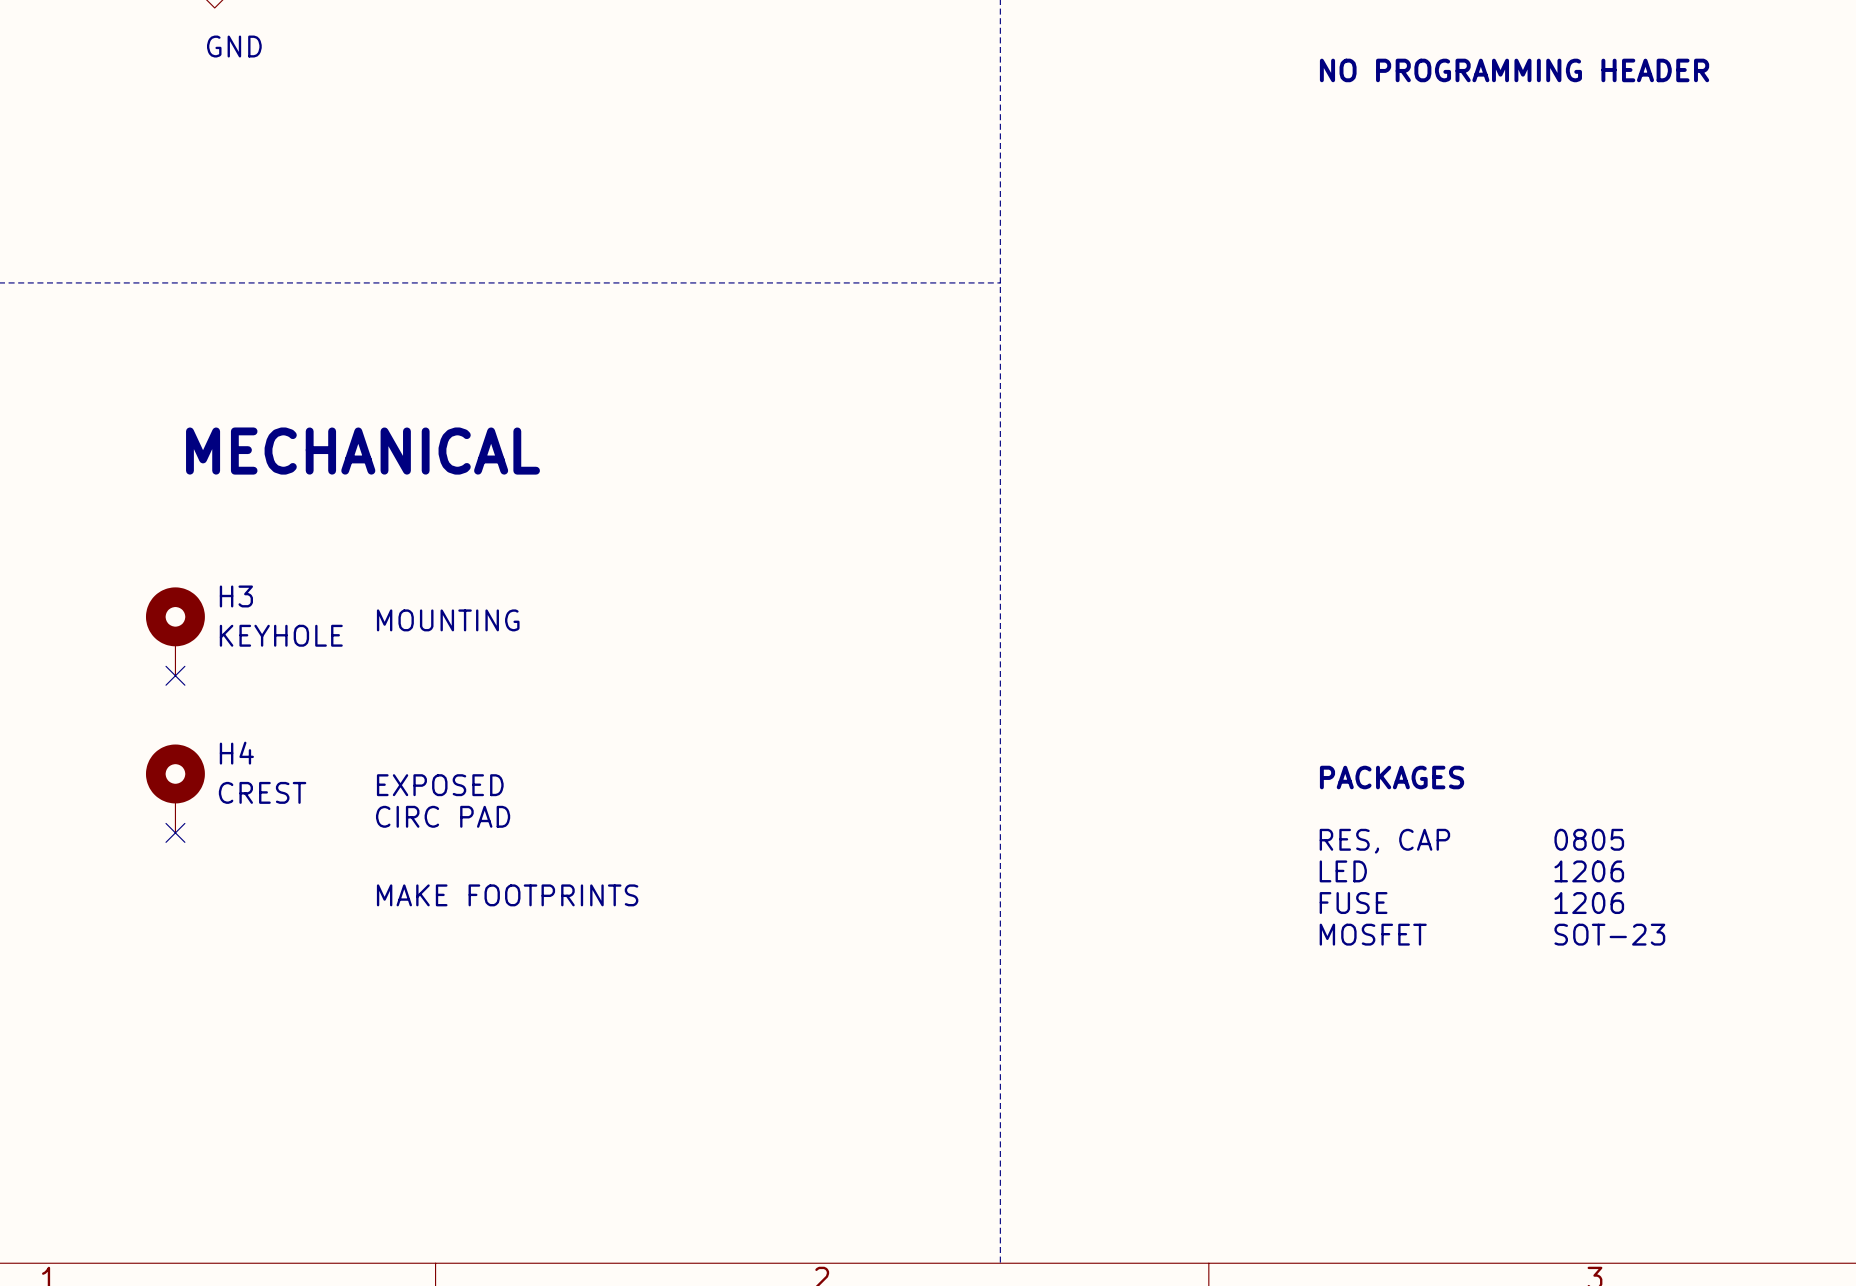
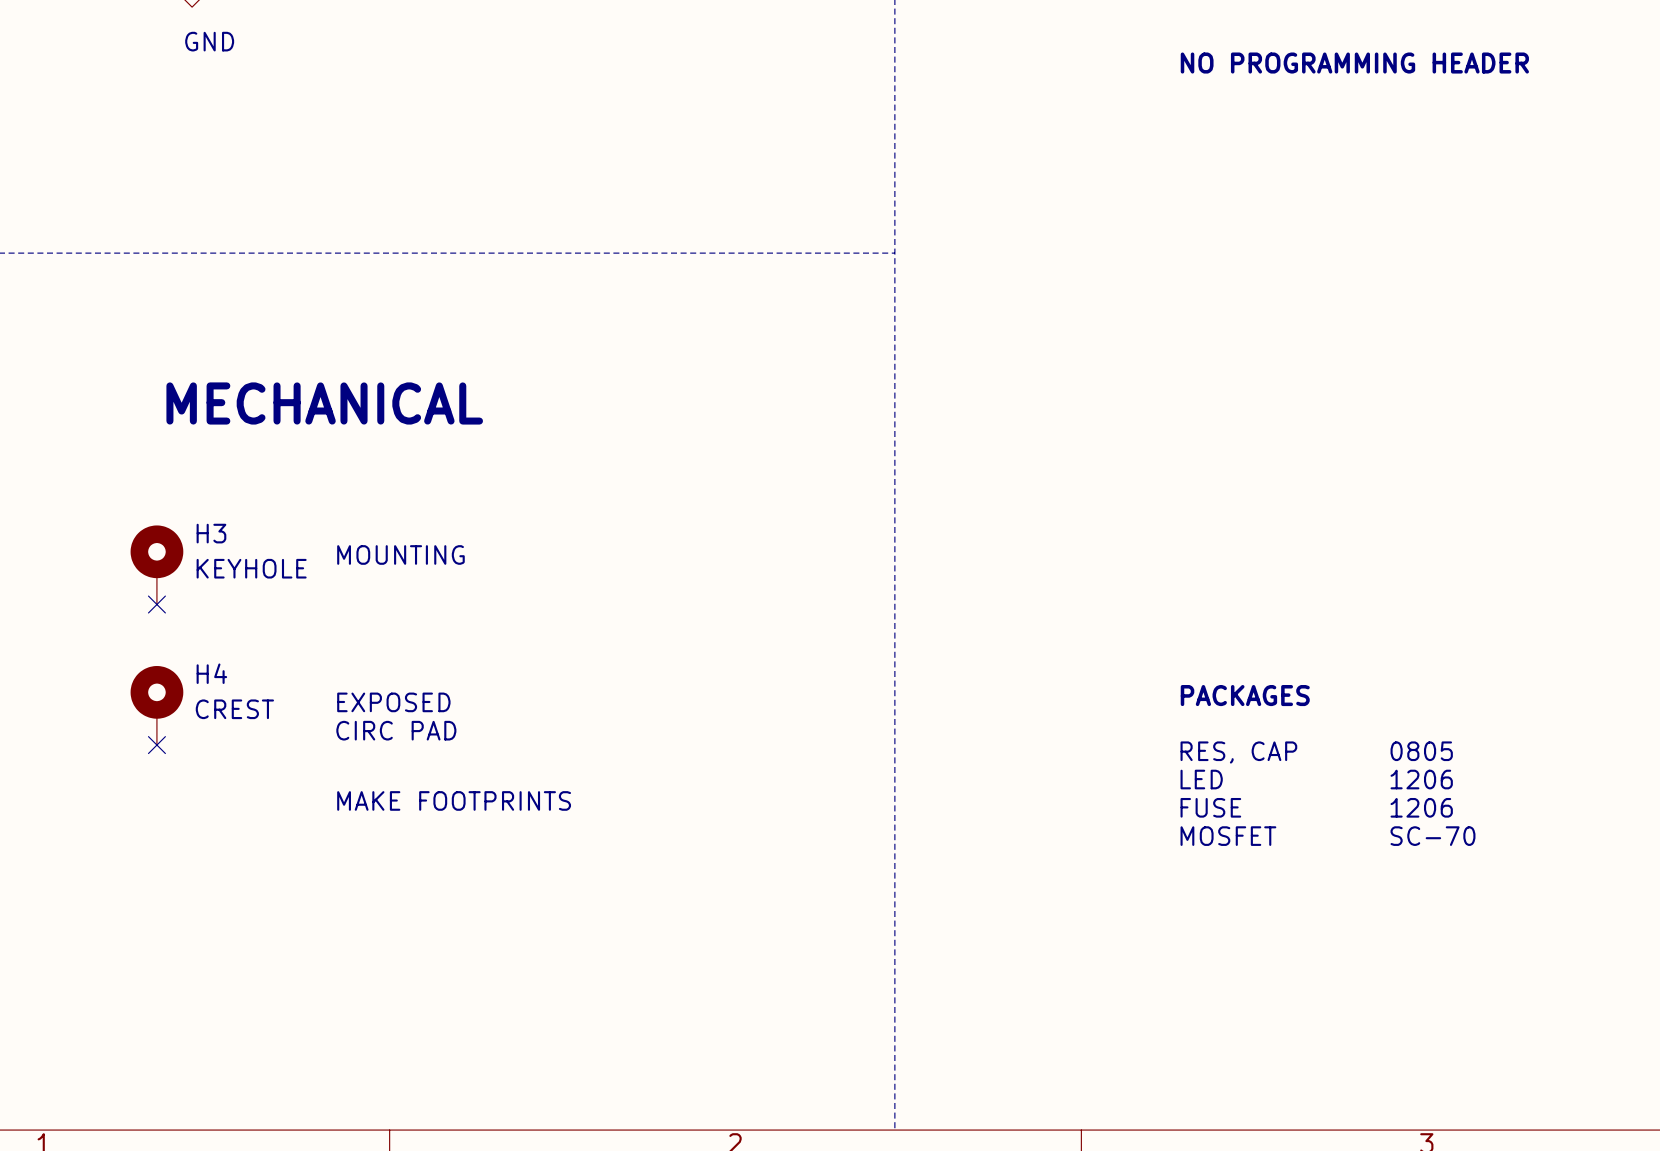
text: SOT-23 (1609, 934) -> SC-70 (1432, 836)

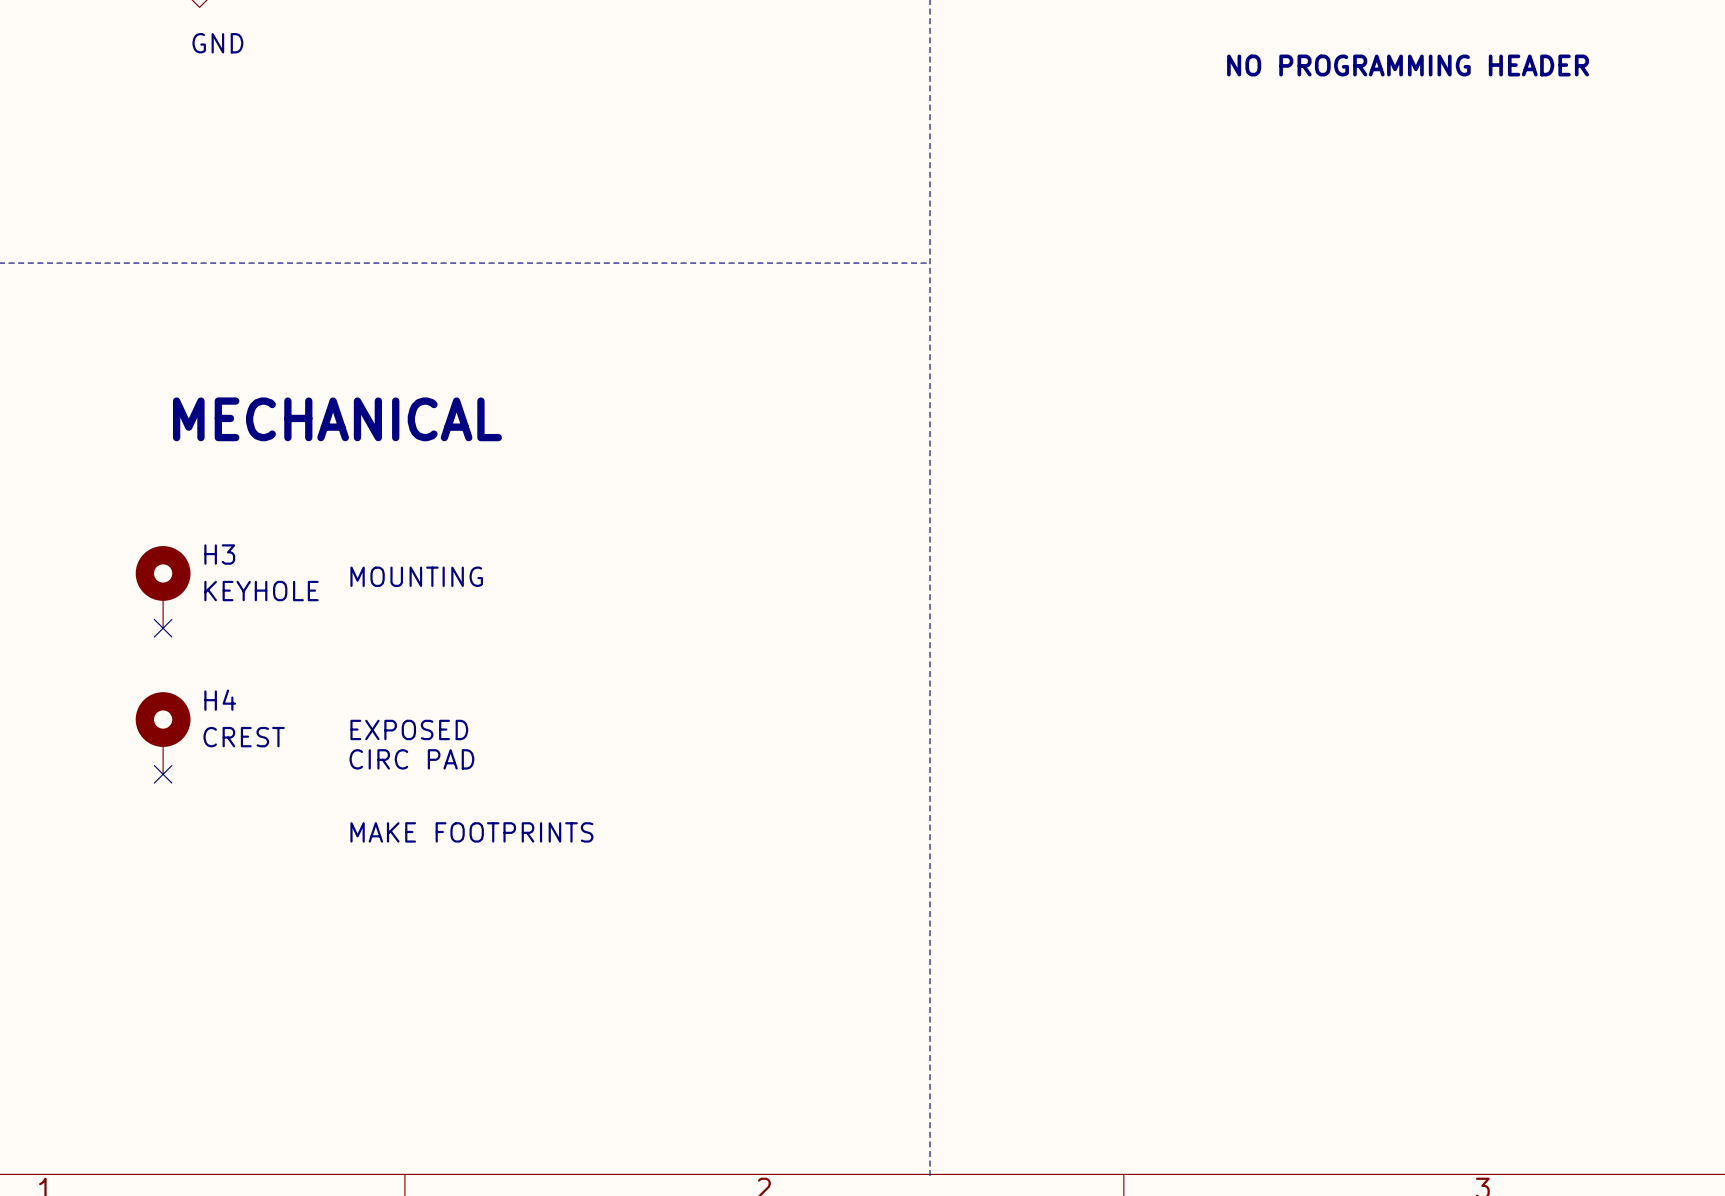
text: PACKAGES (1245, 695) -> none
text: 0805 (1421, 751) -> none
text: RES, CAP (1238, 752) -> none
text: LED (1201, 779) -> none
text: 1206 (1421, 779) -> none
text: FUSE (1210, 807) -> none
text: 1206 (1421, 807) -> none
text: MOSFET (1228, 836) -> none
text: SC-70 (1432, 836) -> none

